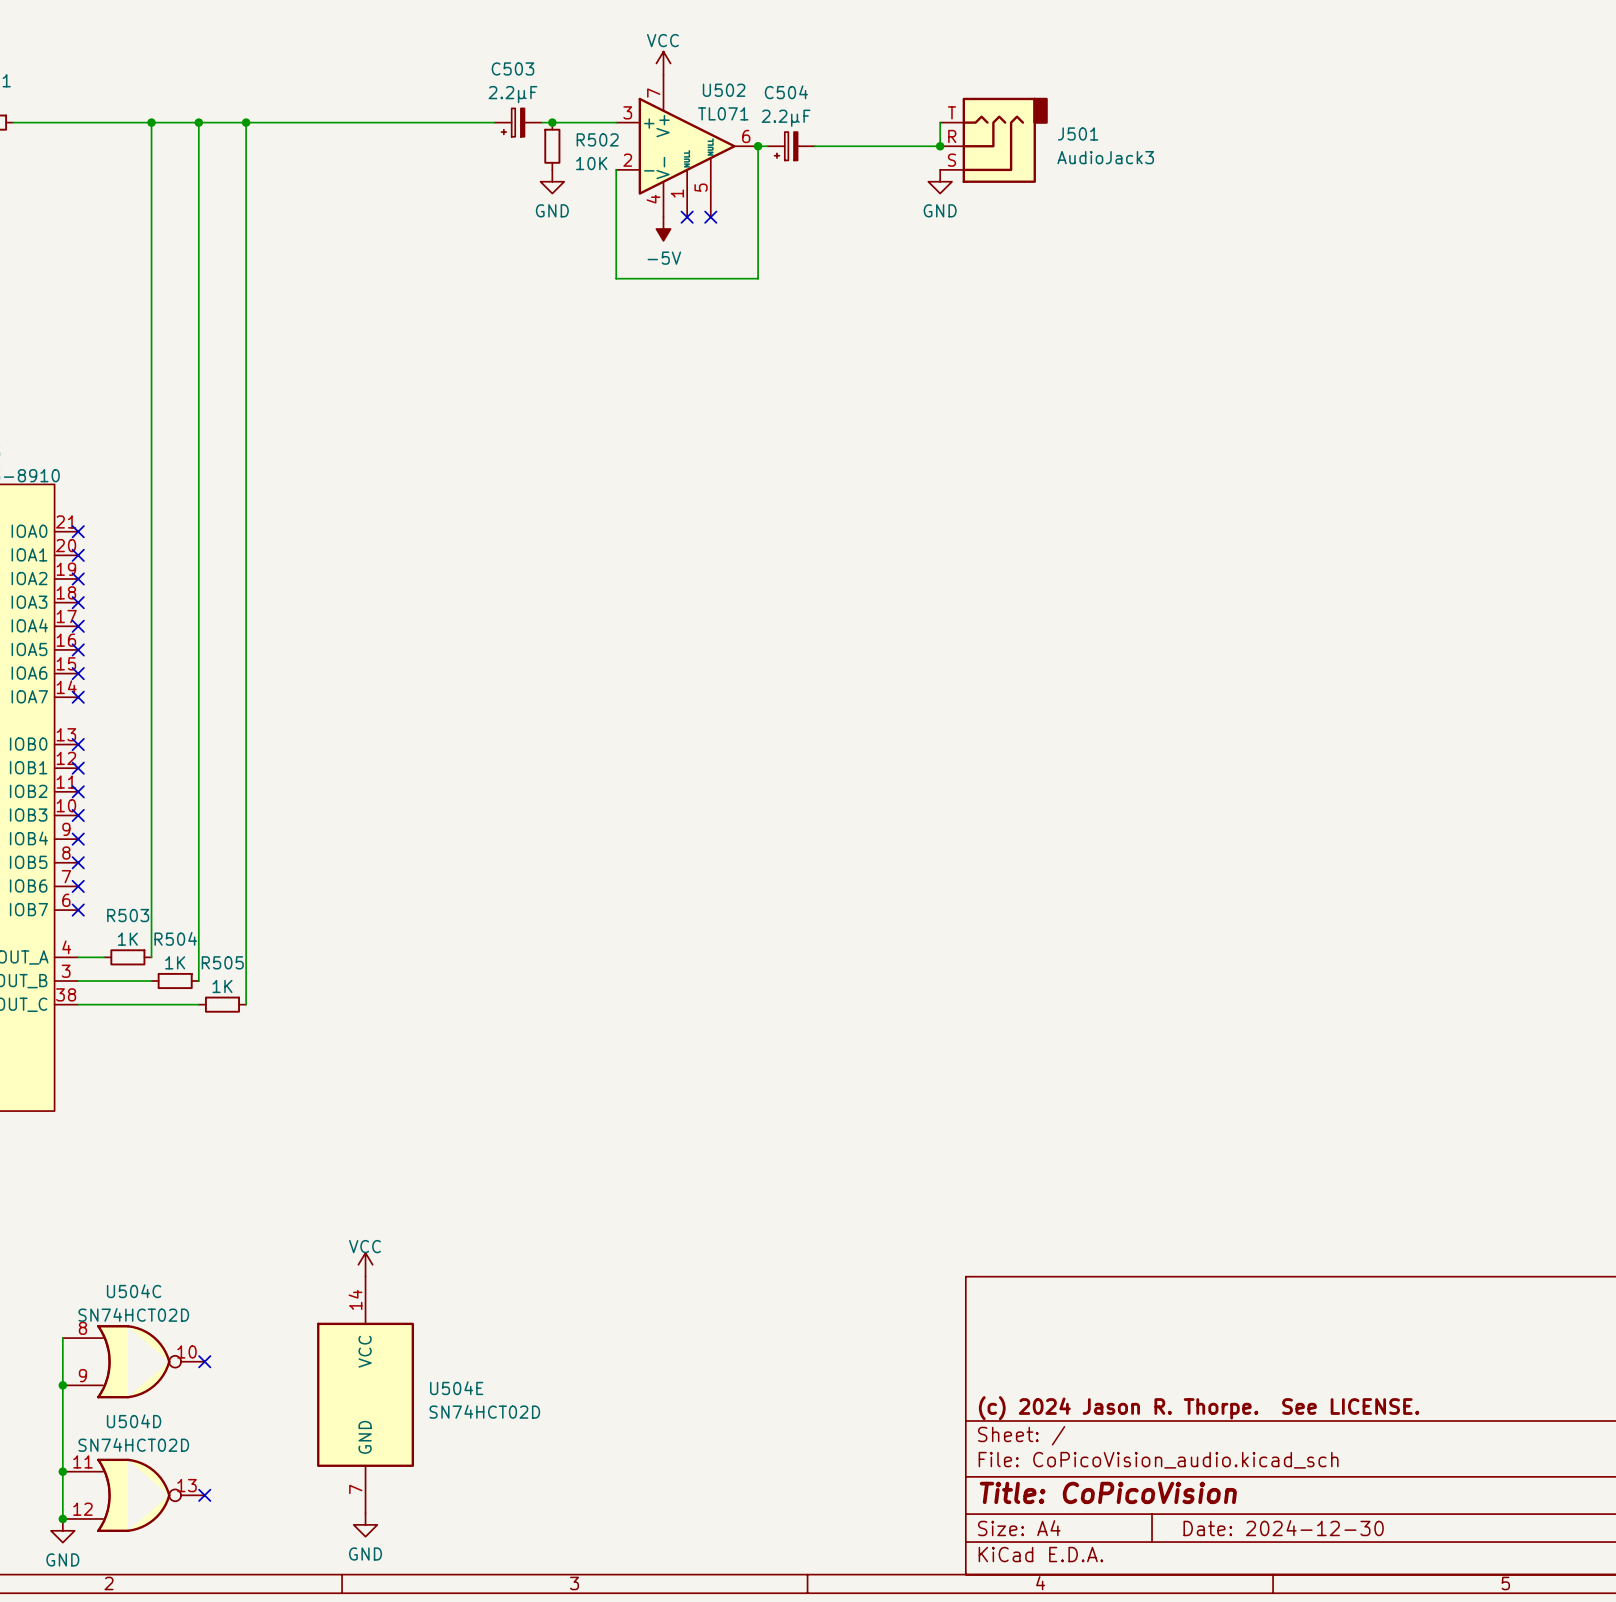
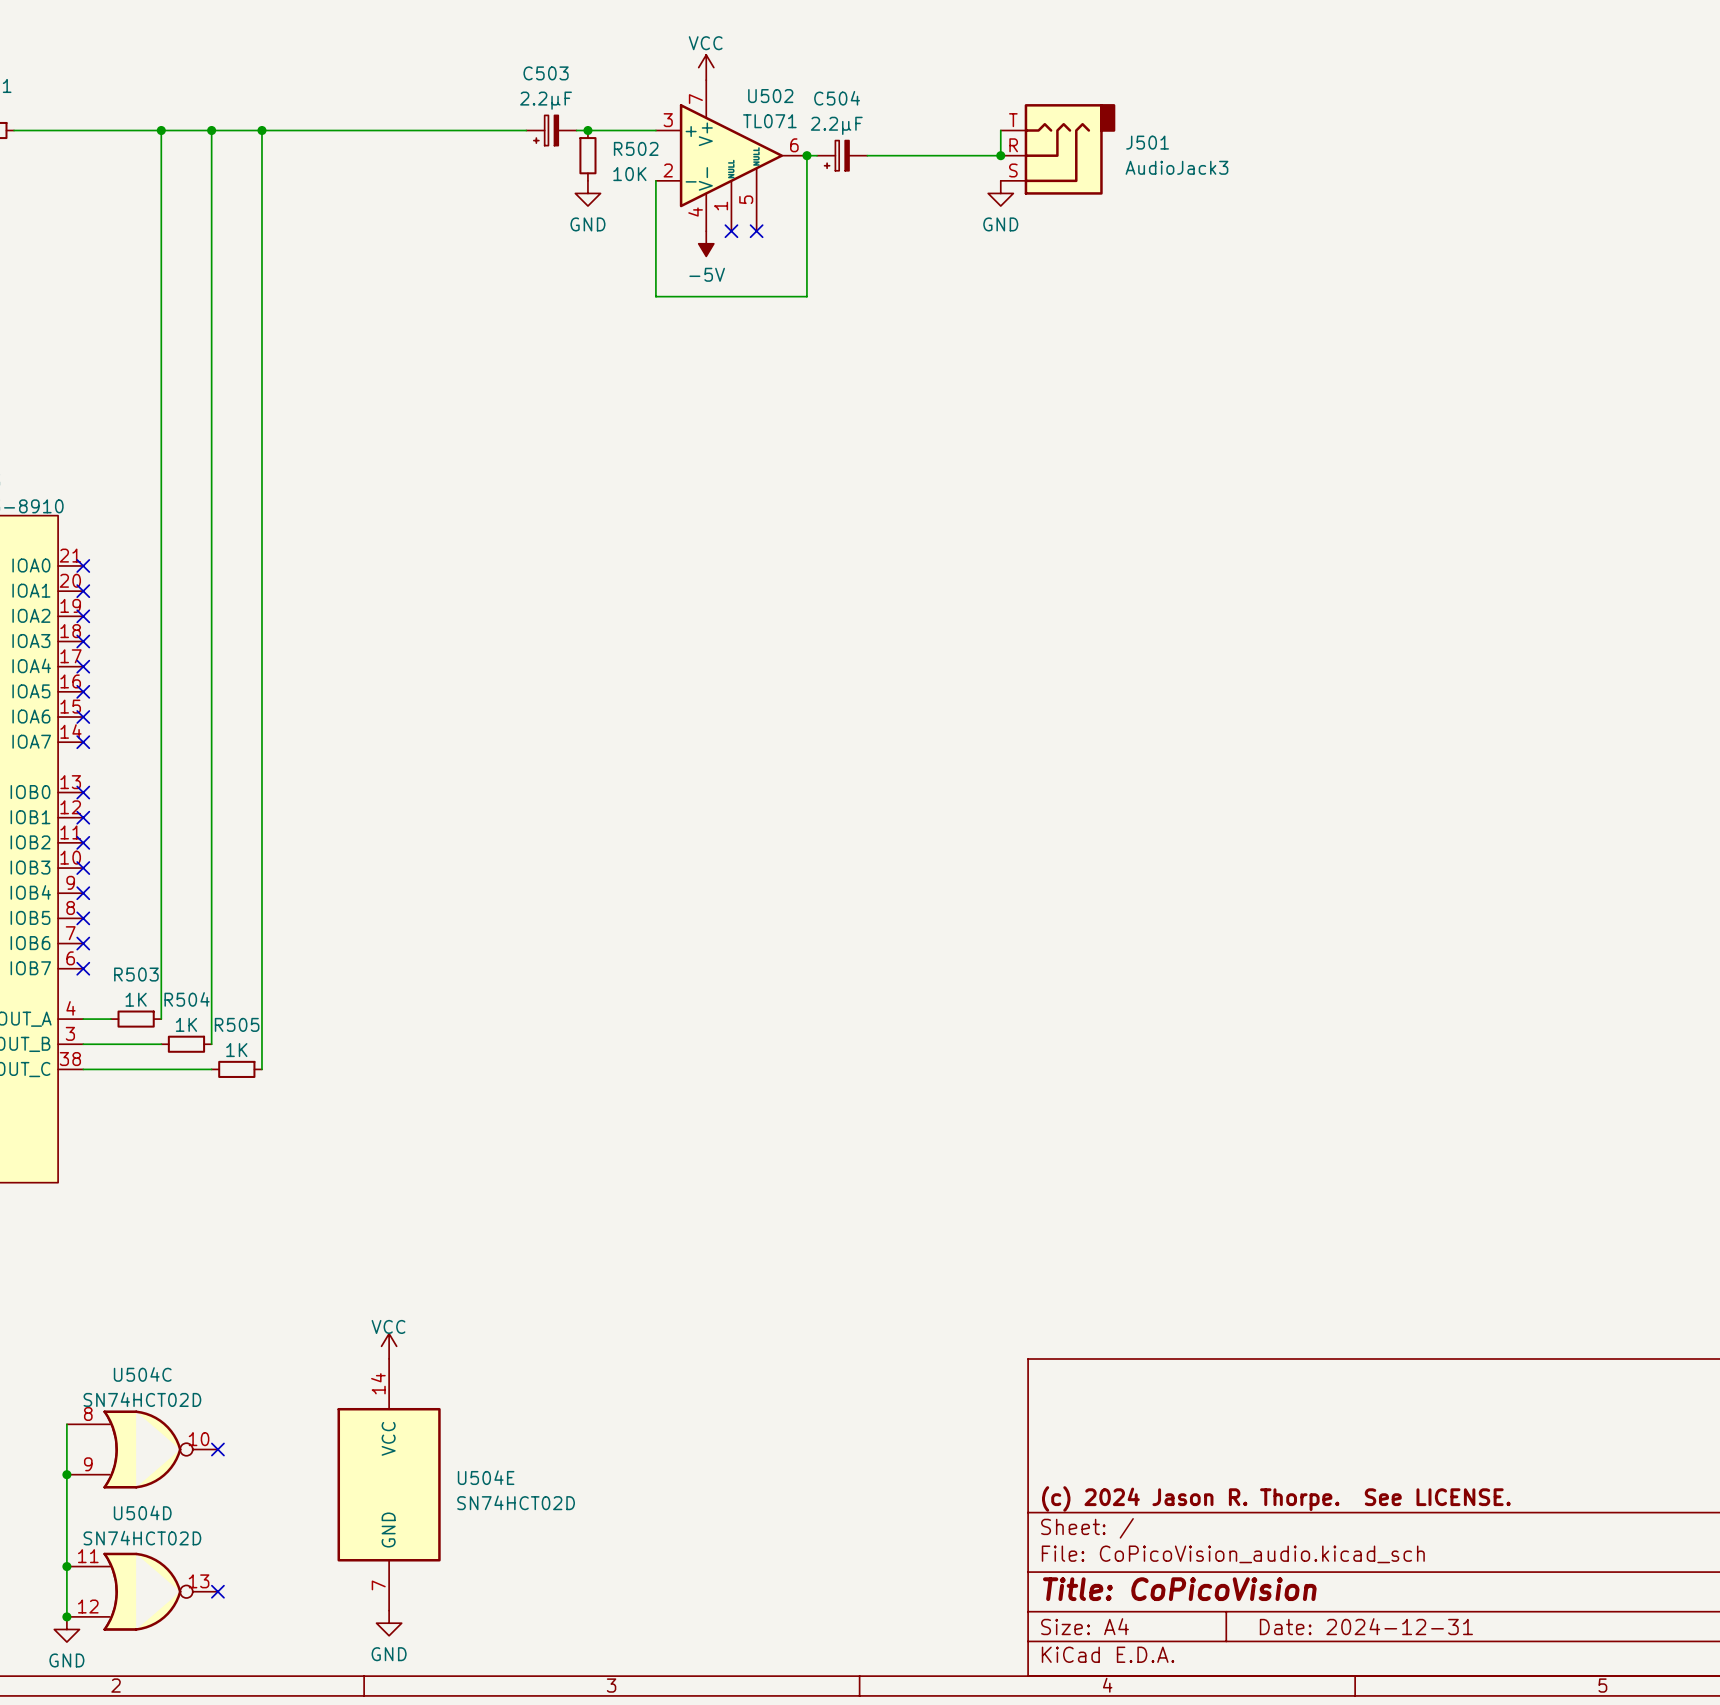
title block: Date: 2024-12-30 (1283, 1528) -> Date: 2024-12-31 (1366, 1626)

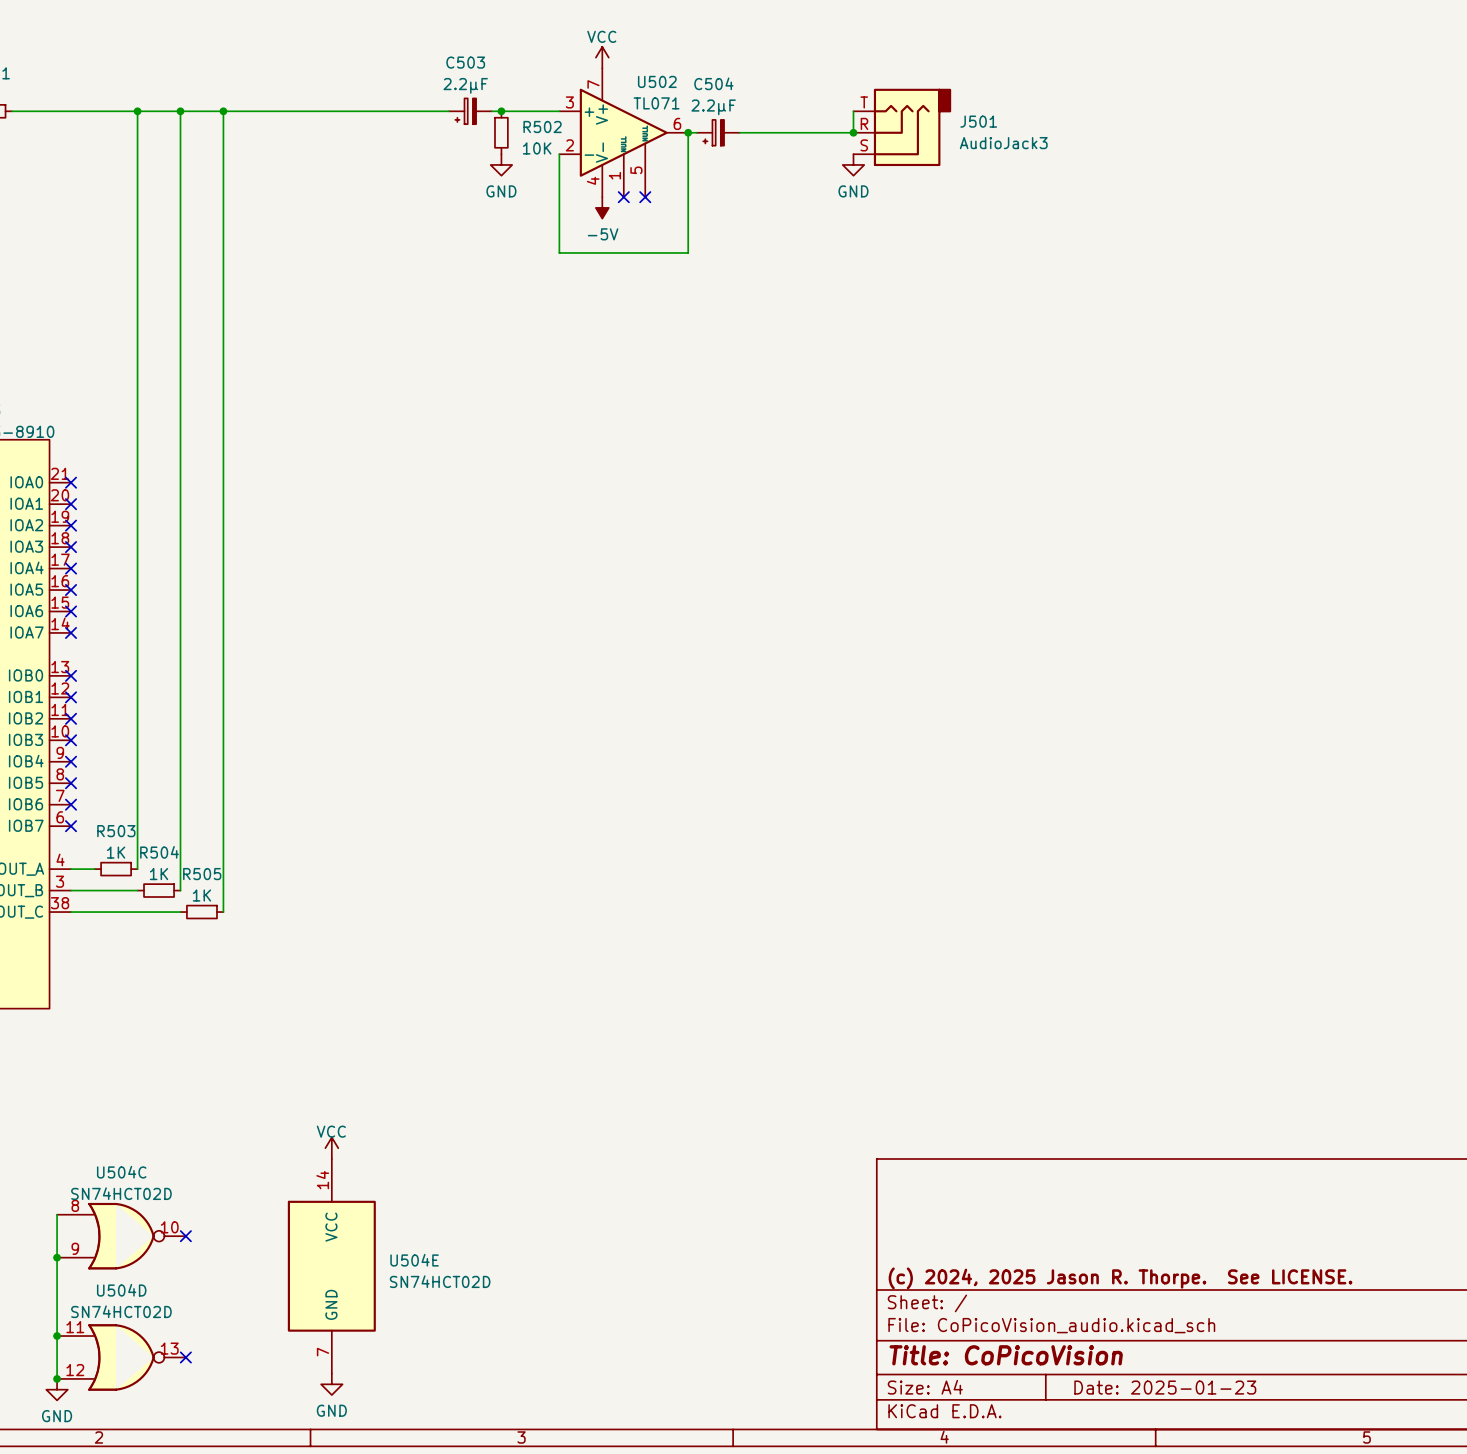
title block: (c) 2024 Jason R. Thorpe. See LICENSE. (1276, 1498) -> (c) 2024, 2025 Jason R. Thorpe. See LICENSE. (1120, 1278)
title block: Date: 2024-12-31 (1366, 1626) -> Date: 2025-01-23 (1165, 1387)

